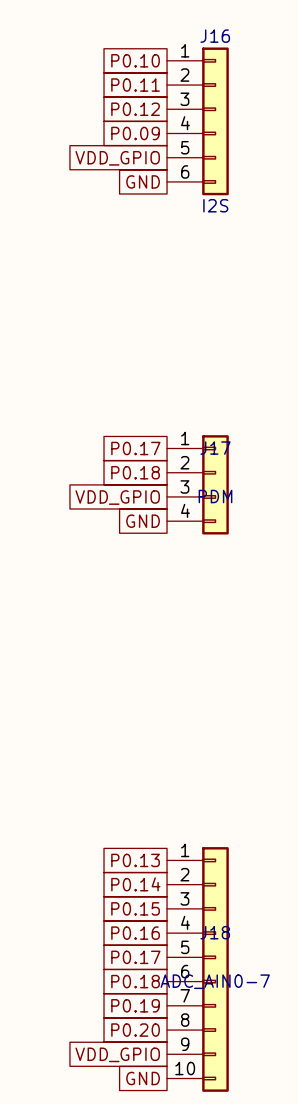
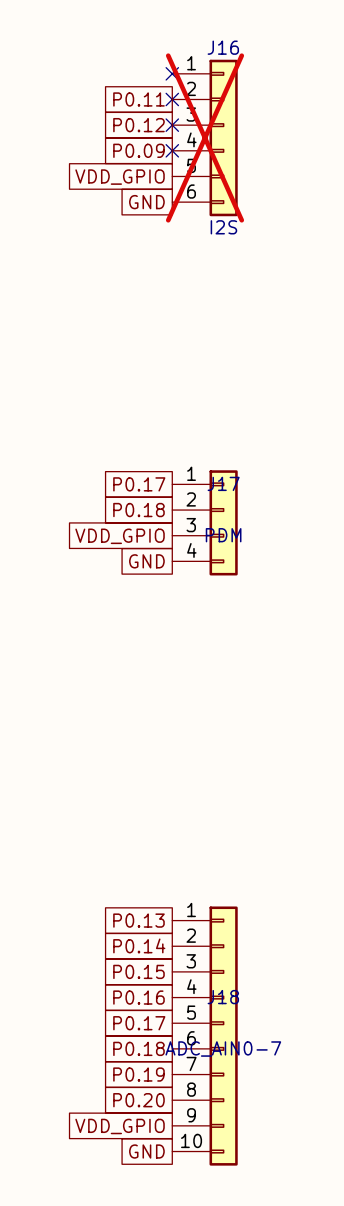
global label: P0.10 (135, 60) -> none
no-connect mark: none -> (172, 73)
no-connect mark: none -> (172, 99)
no-connect mark: none -> (172, 125)
J16 do-not-place cross: none -> (205, 137)
no-connect mark: none -> (172, 150)

